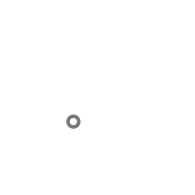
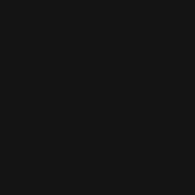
via: (73, 121) -> none

